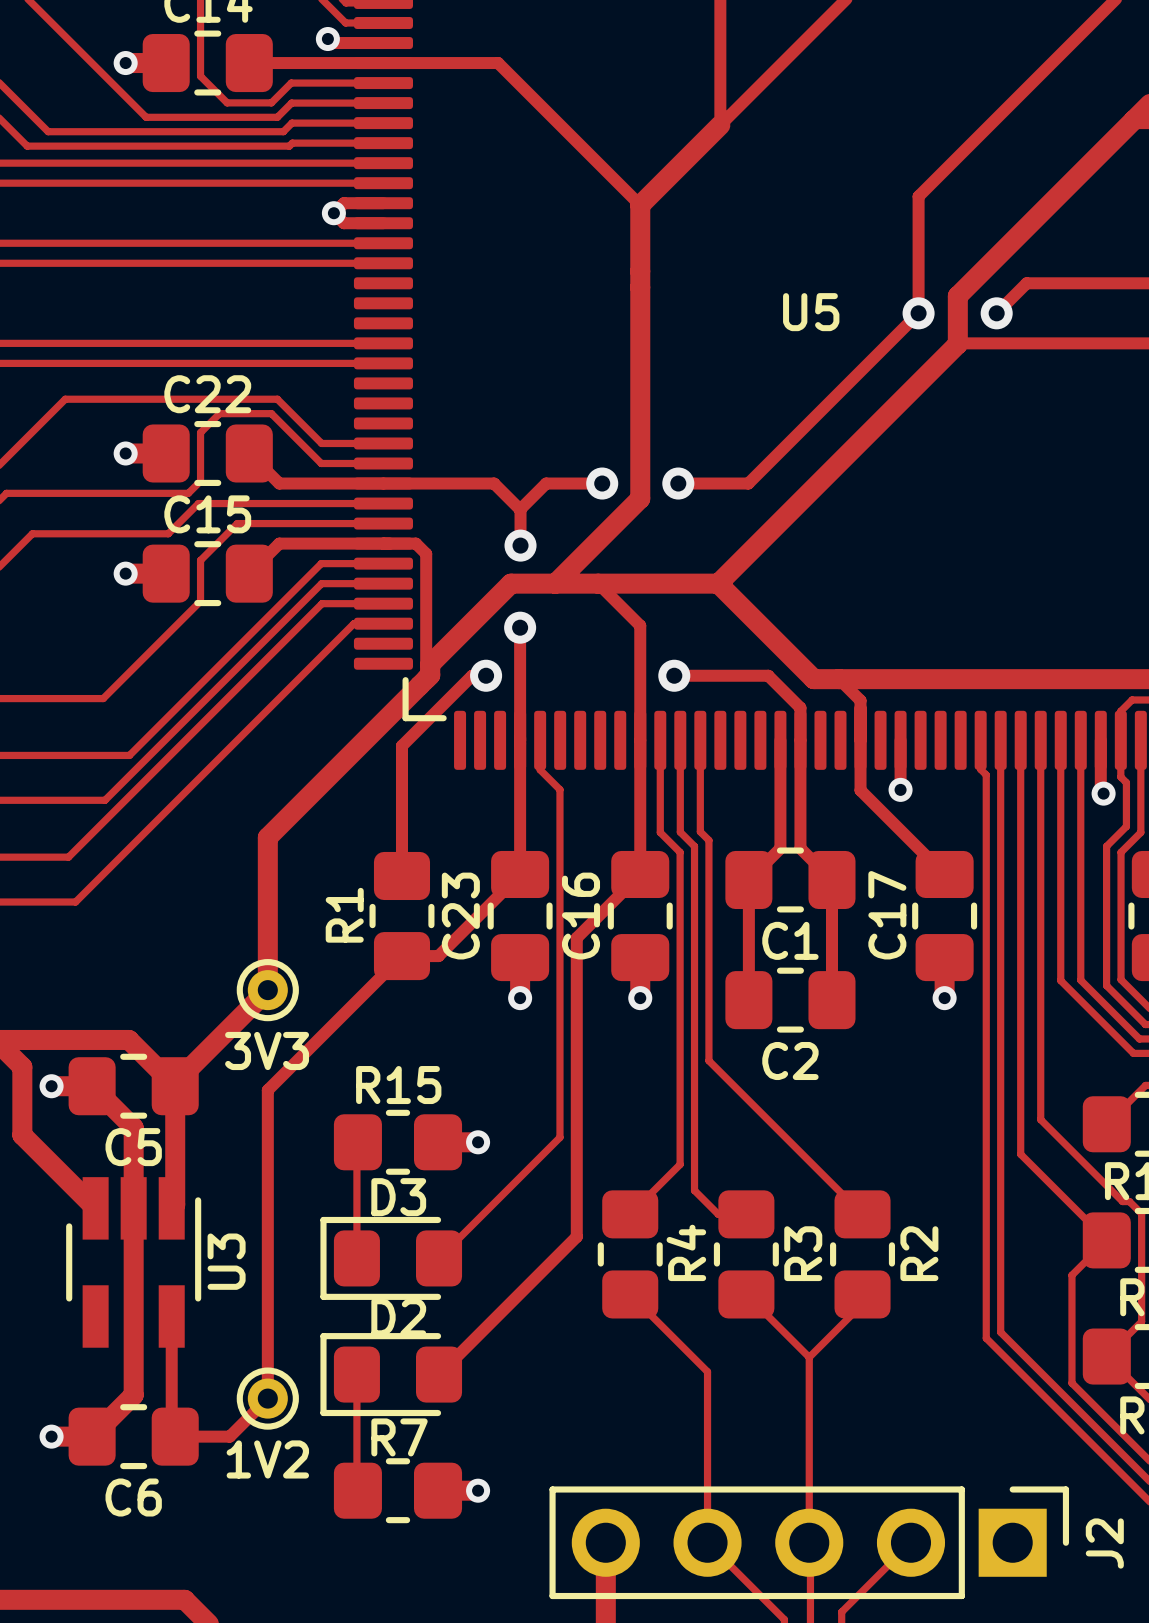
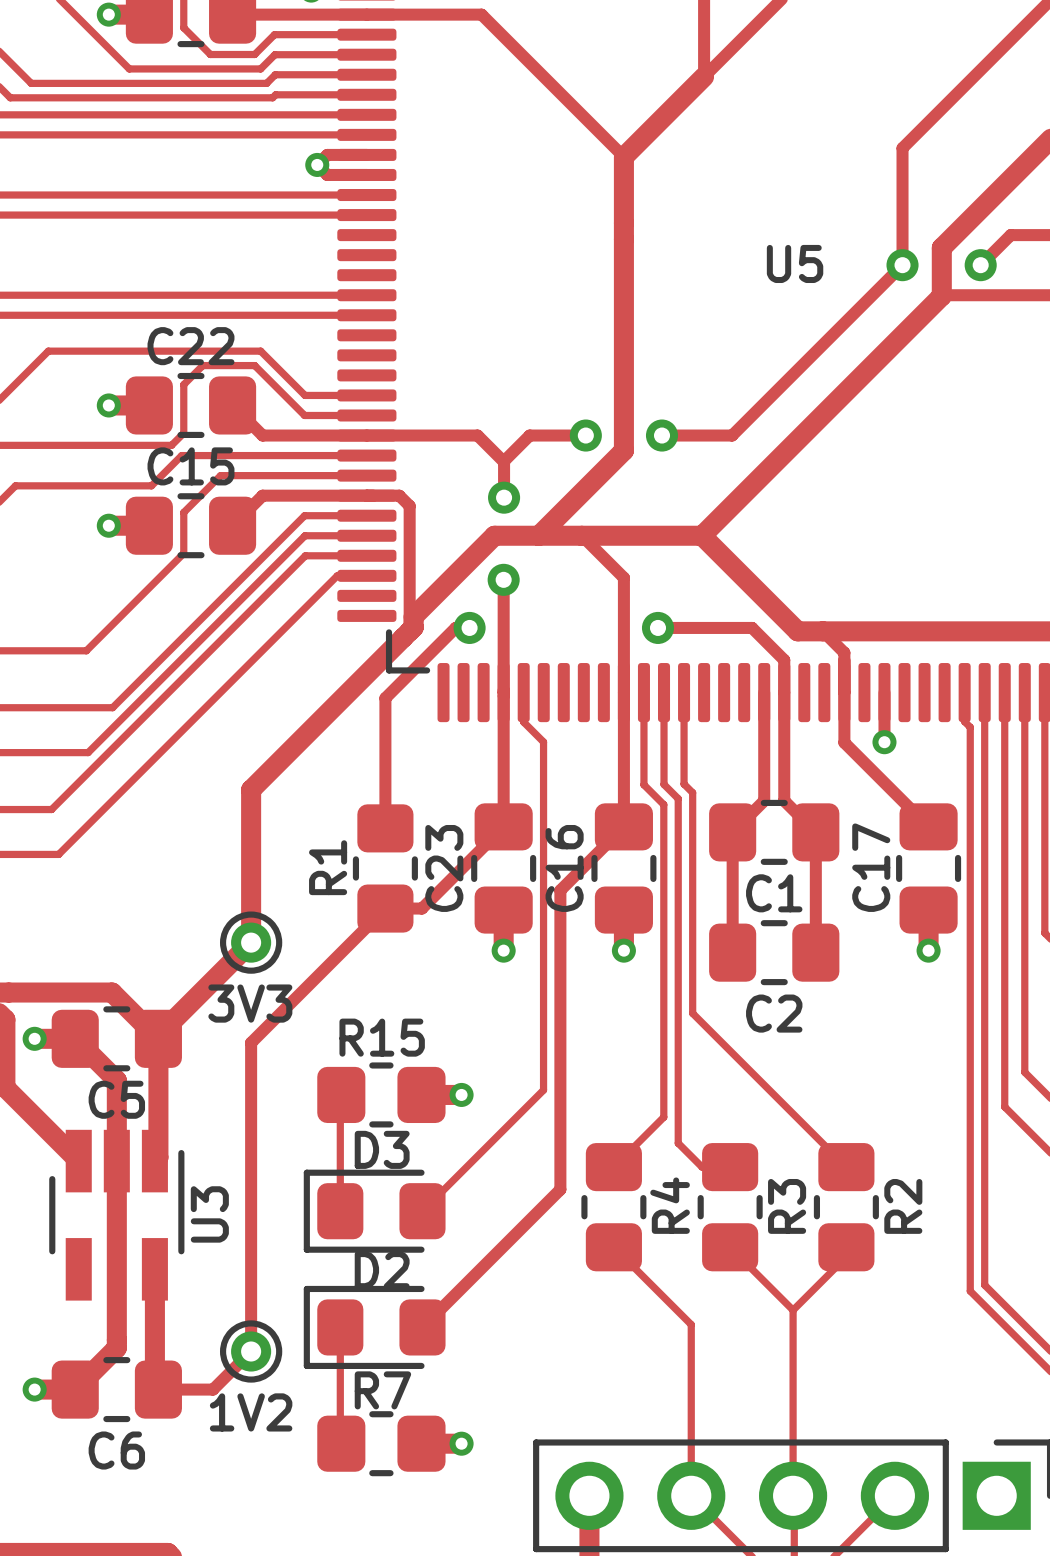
track width: thin (171, 1316) (171, 1425) -> thick (154, 1269) (154, 1378)

